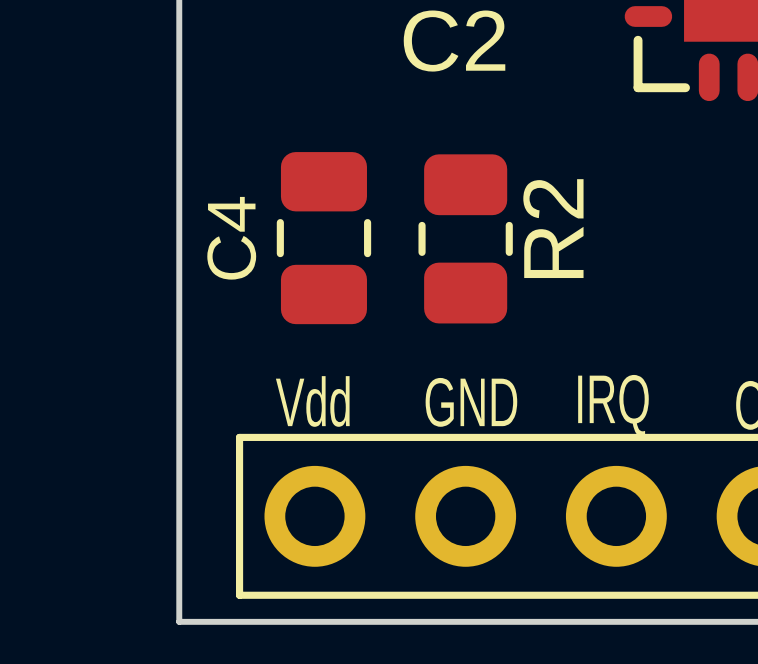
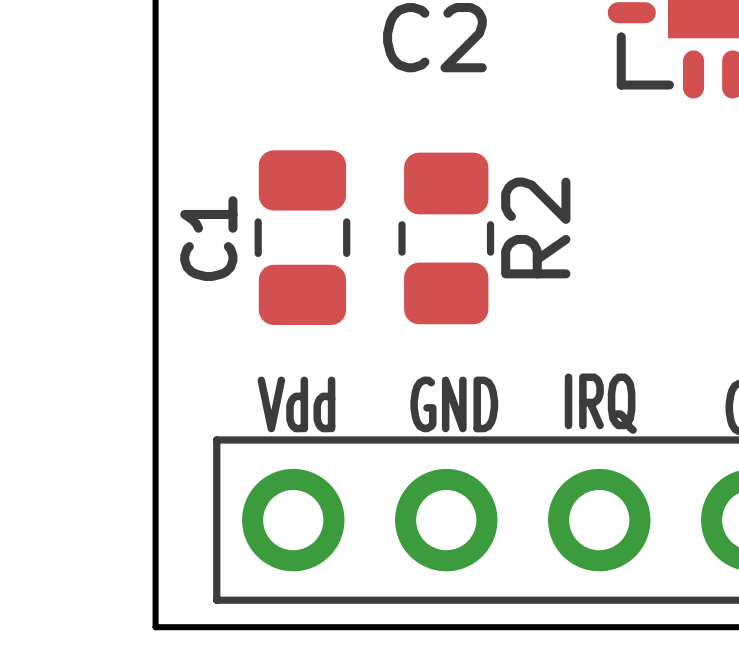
C4 name: C4 (231, 238) -> C1 (208, 238)

